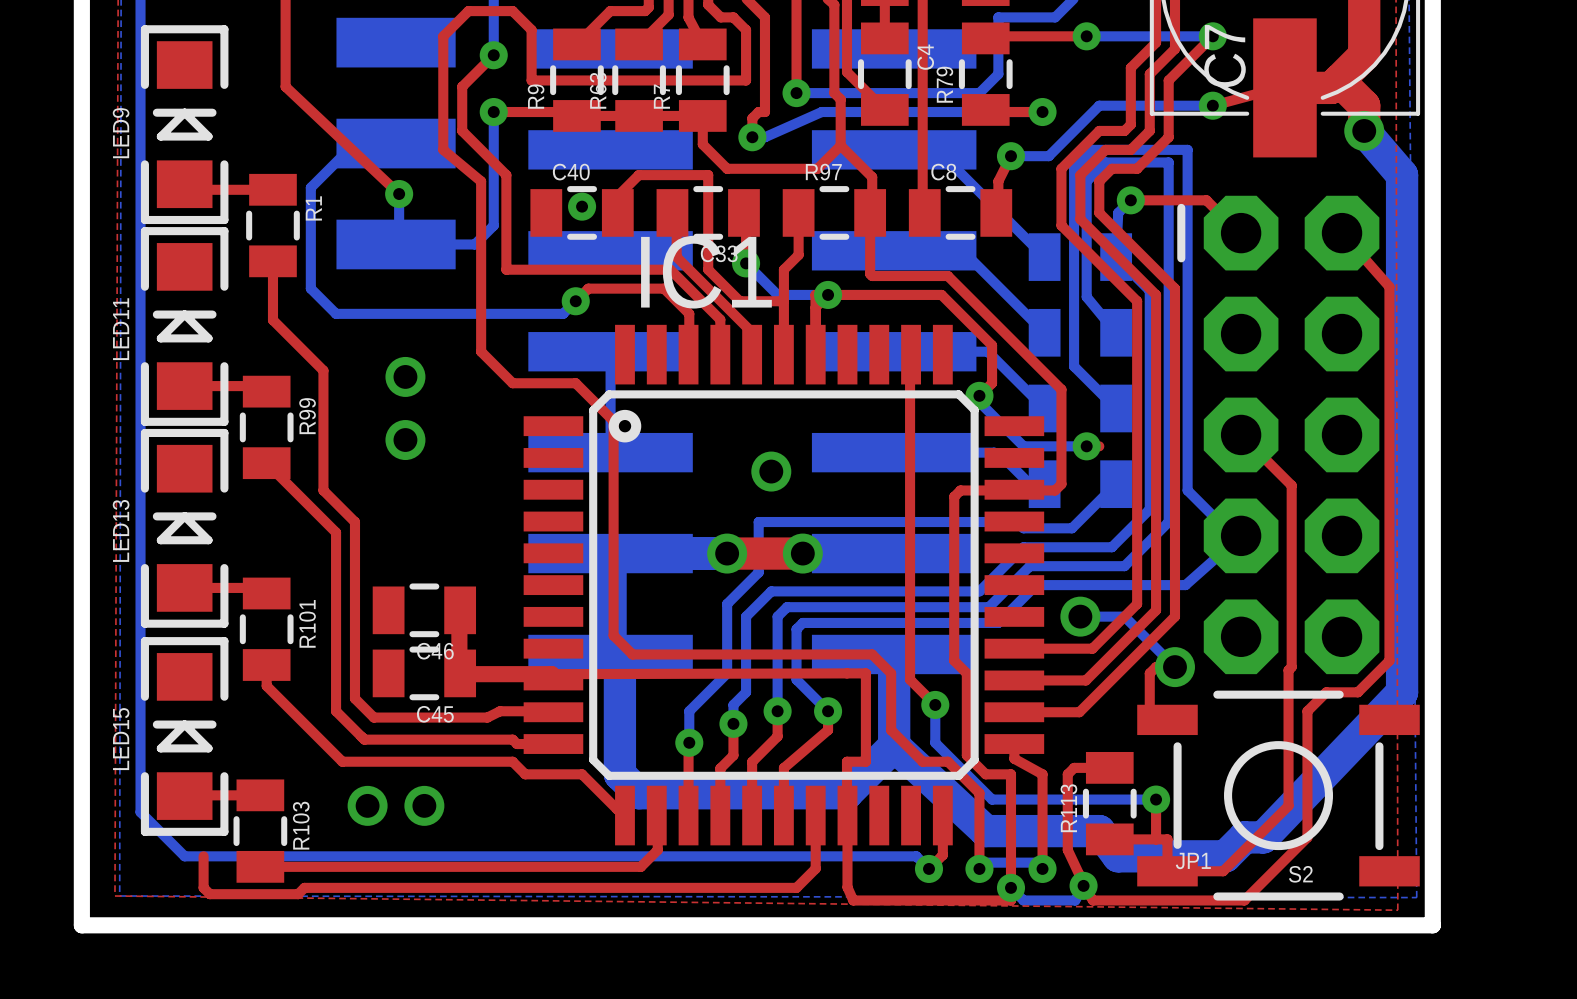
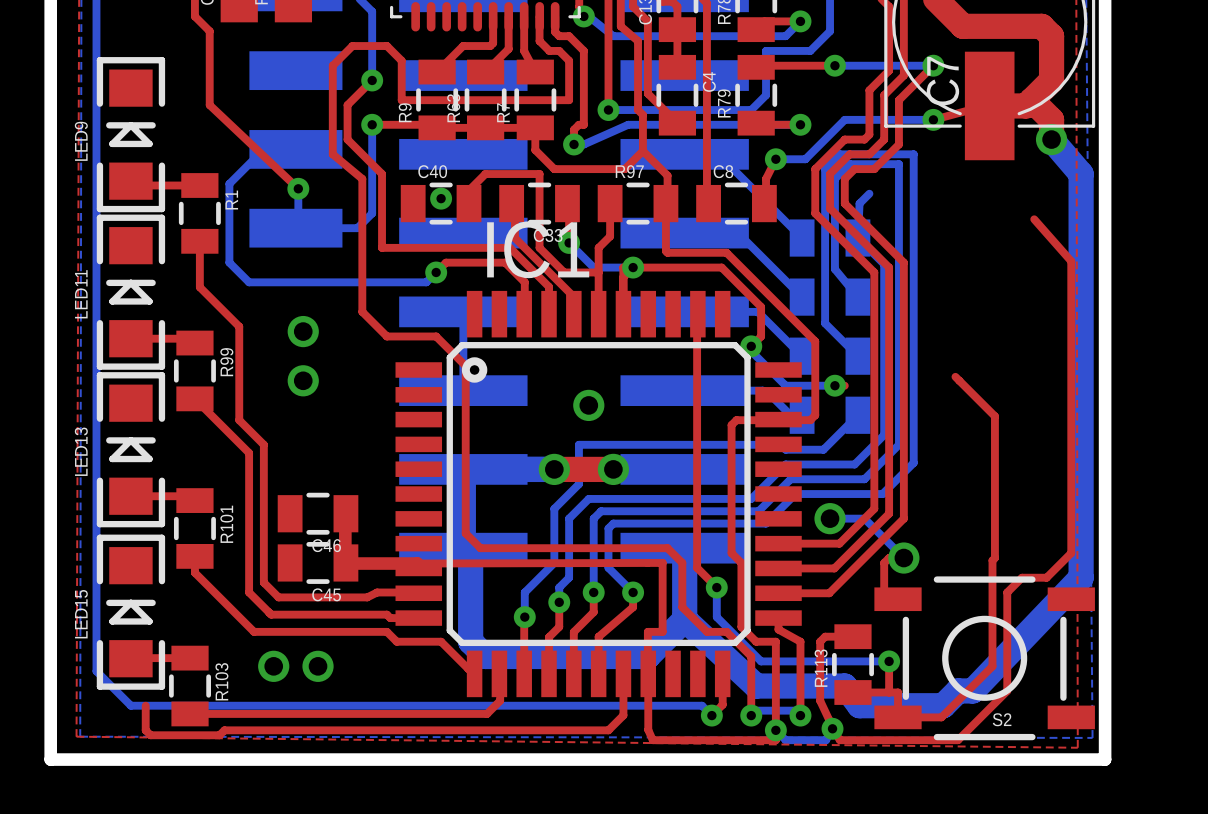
top track: (1130, 200) (1206, 200) (1238, 231) (1242, 231) (1241, 233) -> none
via: (1130, 200) -> none
JP1: (1278, 434) -> none
bottom track: (1187, 490) (1233, 535) (1241, 535) (1185, 585) (1147, 585) -> (913, 420) (913, 462) (882, 494)

